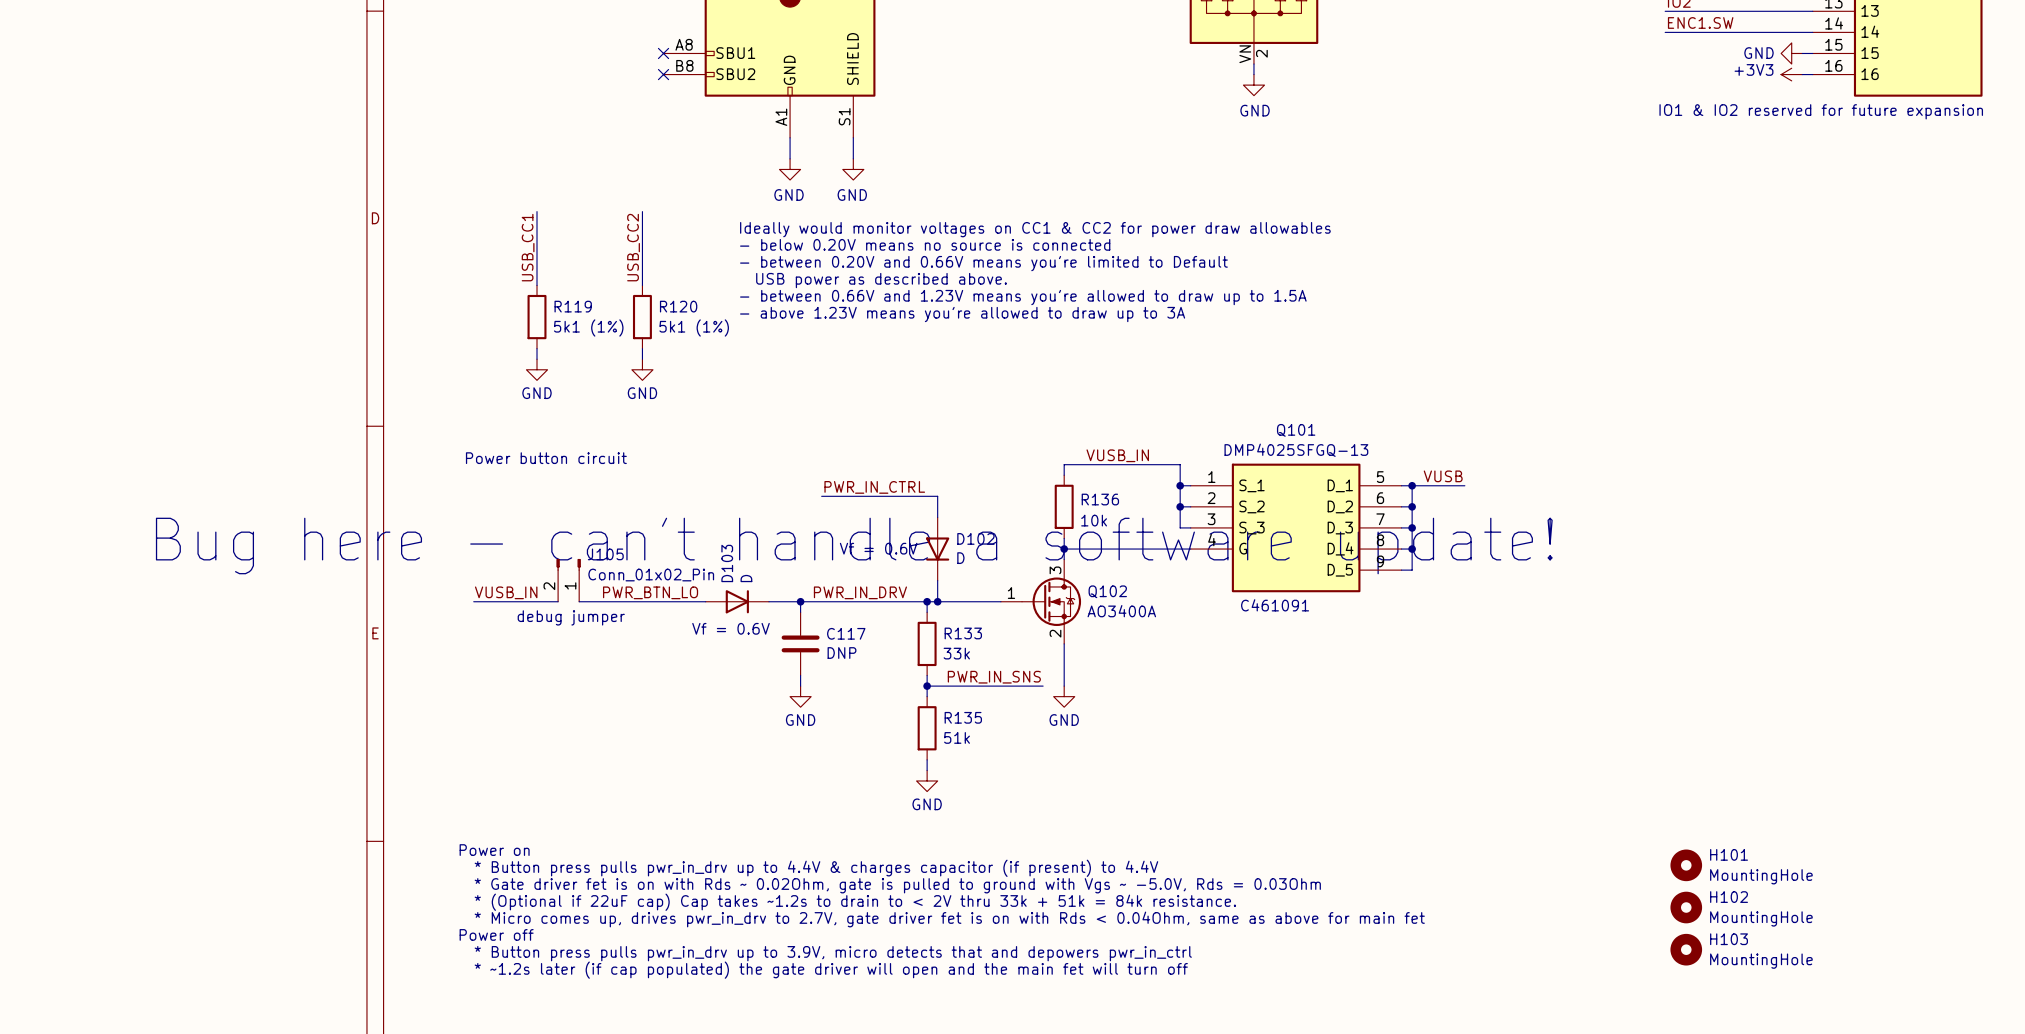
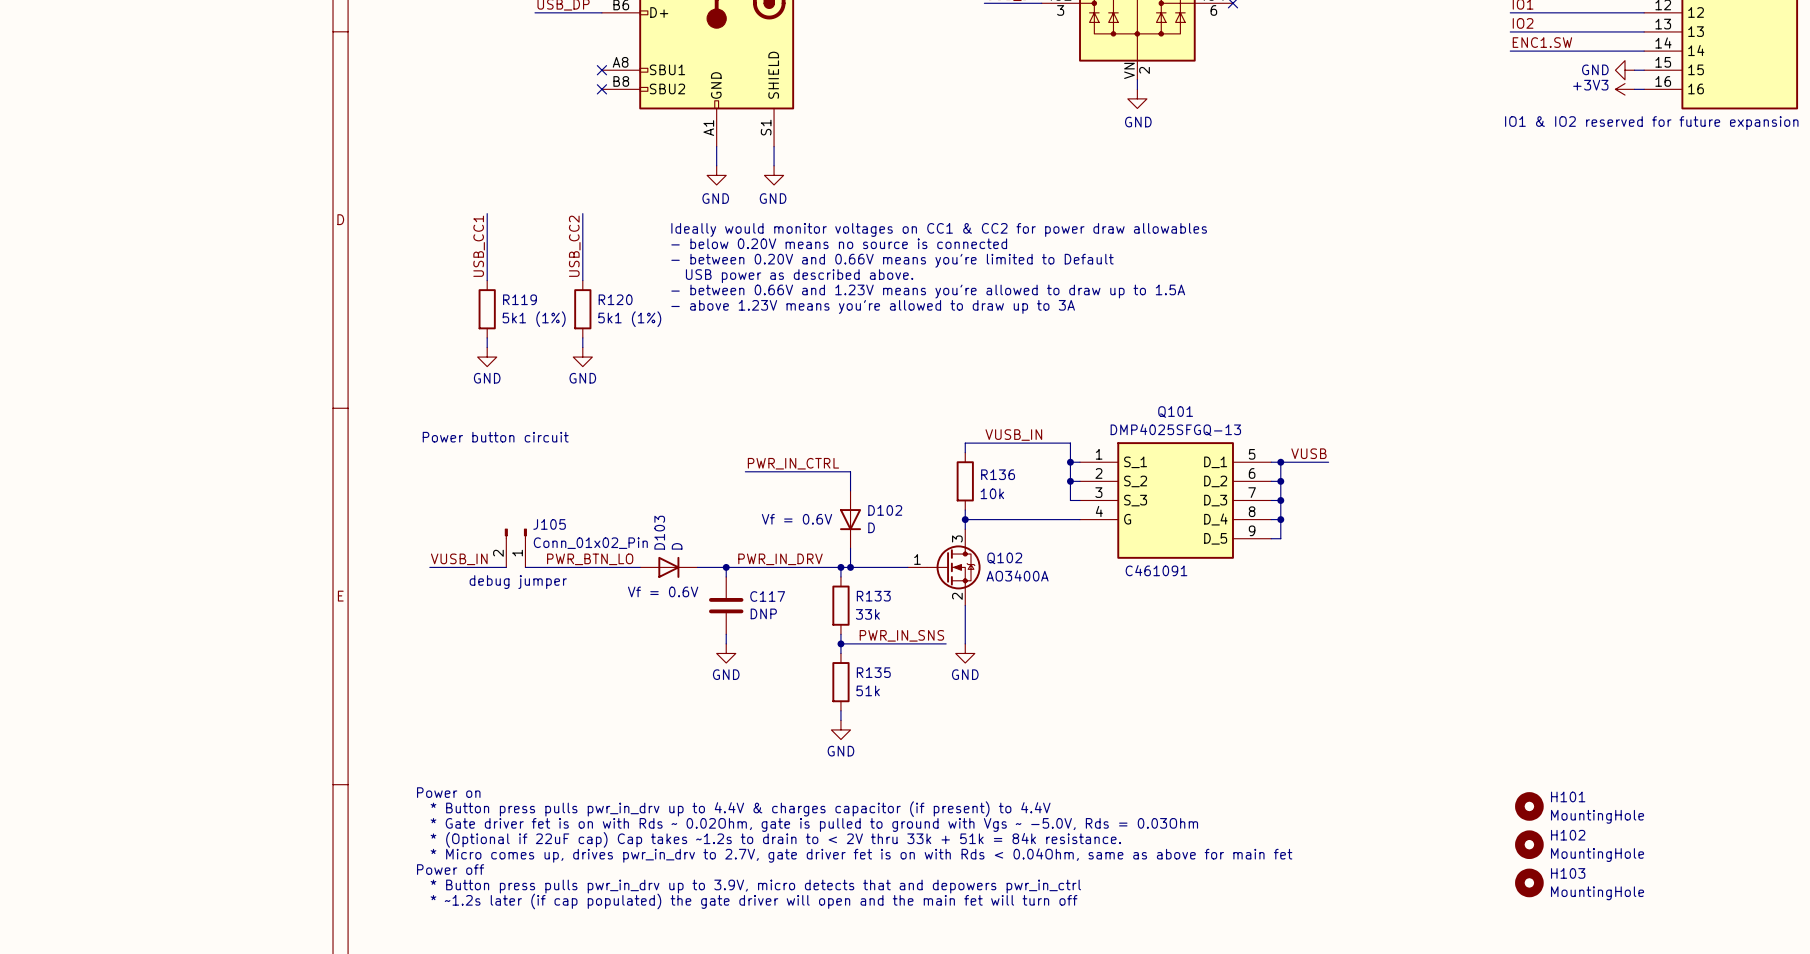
text: Bug here - can't handle a software update! (854, 545) -> none

